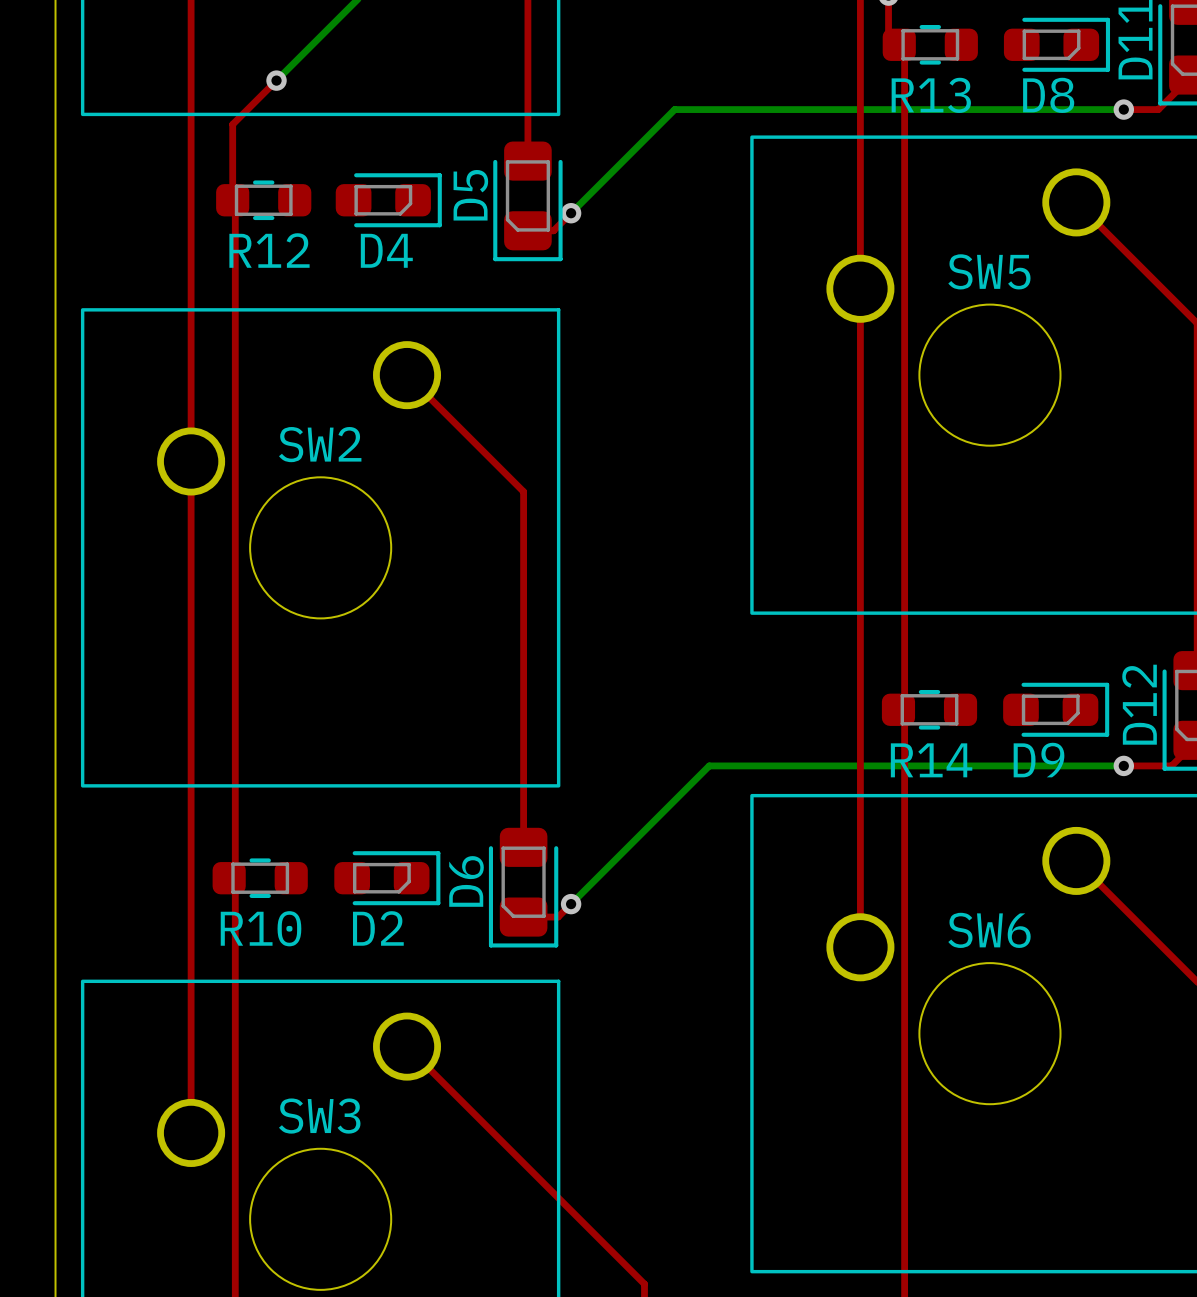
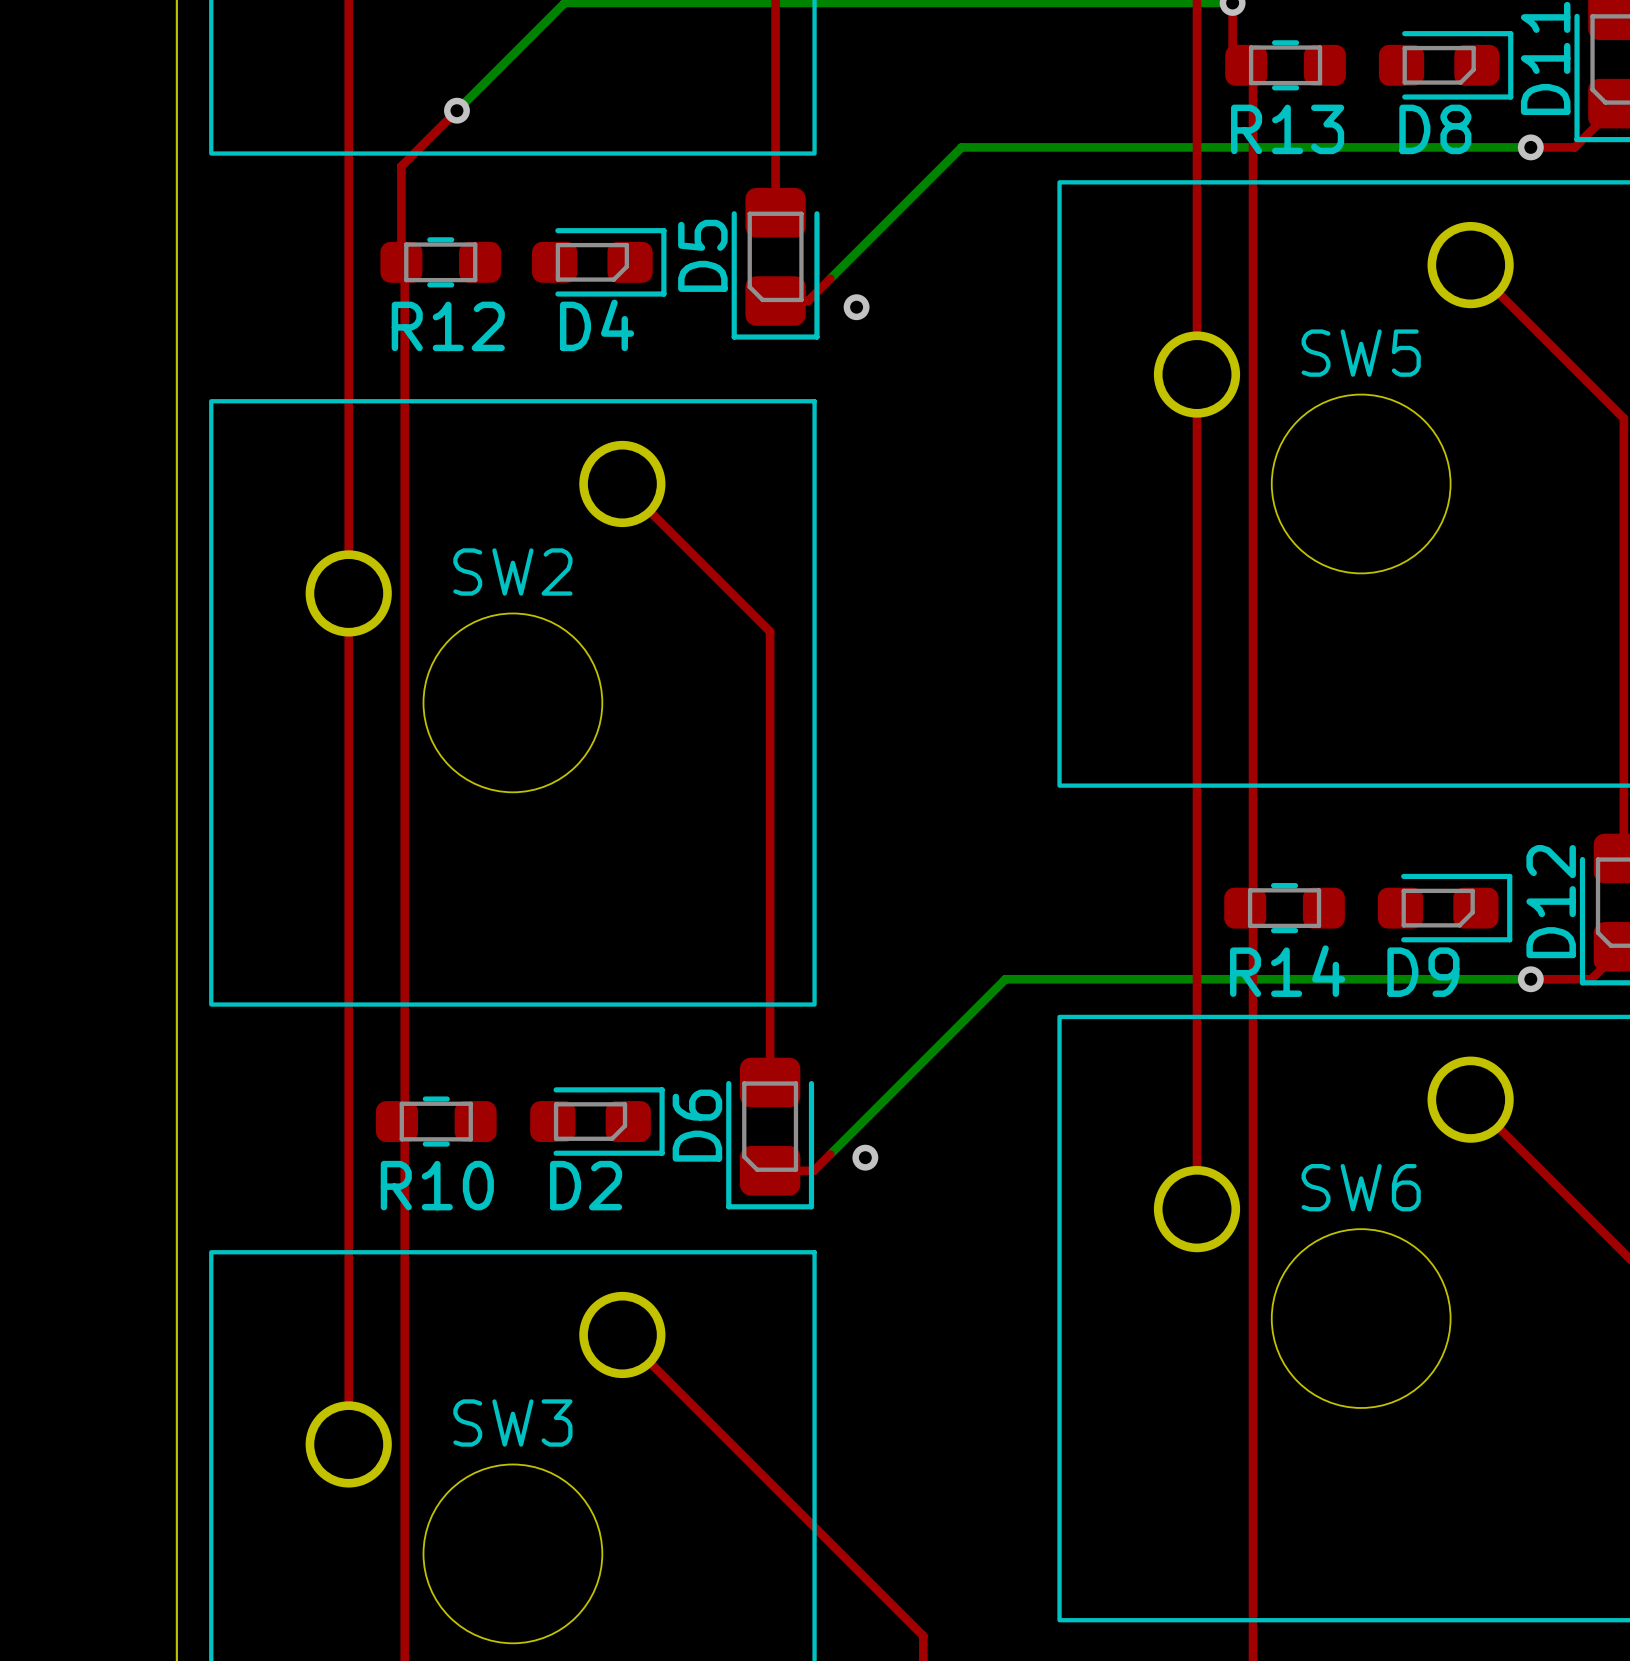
via position: (571, 213) -> (856, 307)
via position: (571, 904) -> (865, 1157)

